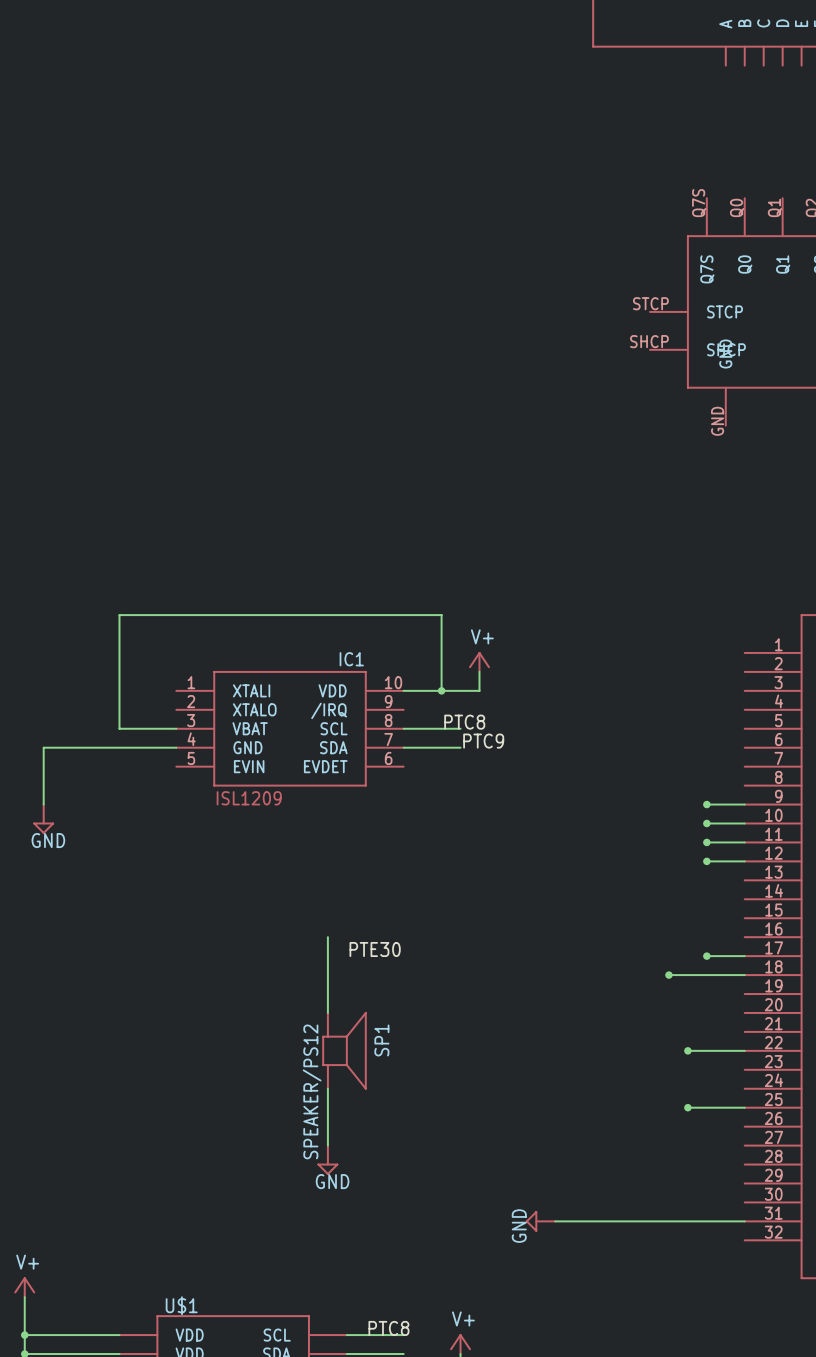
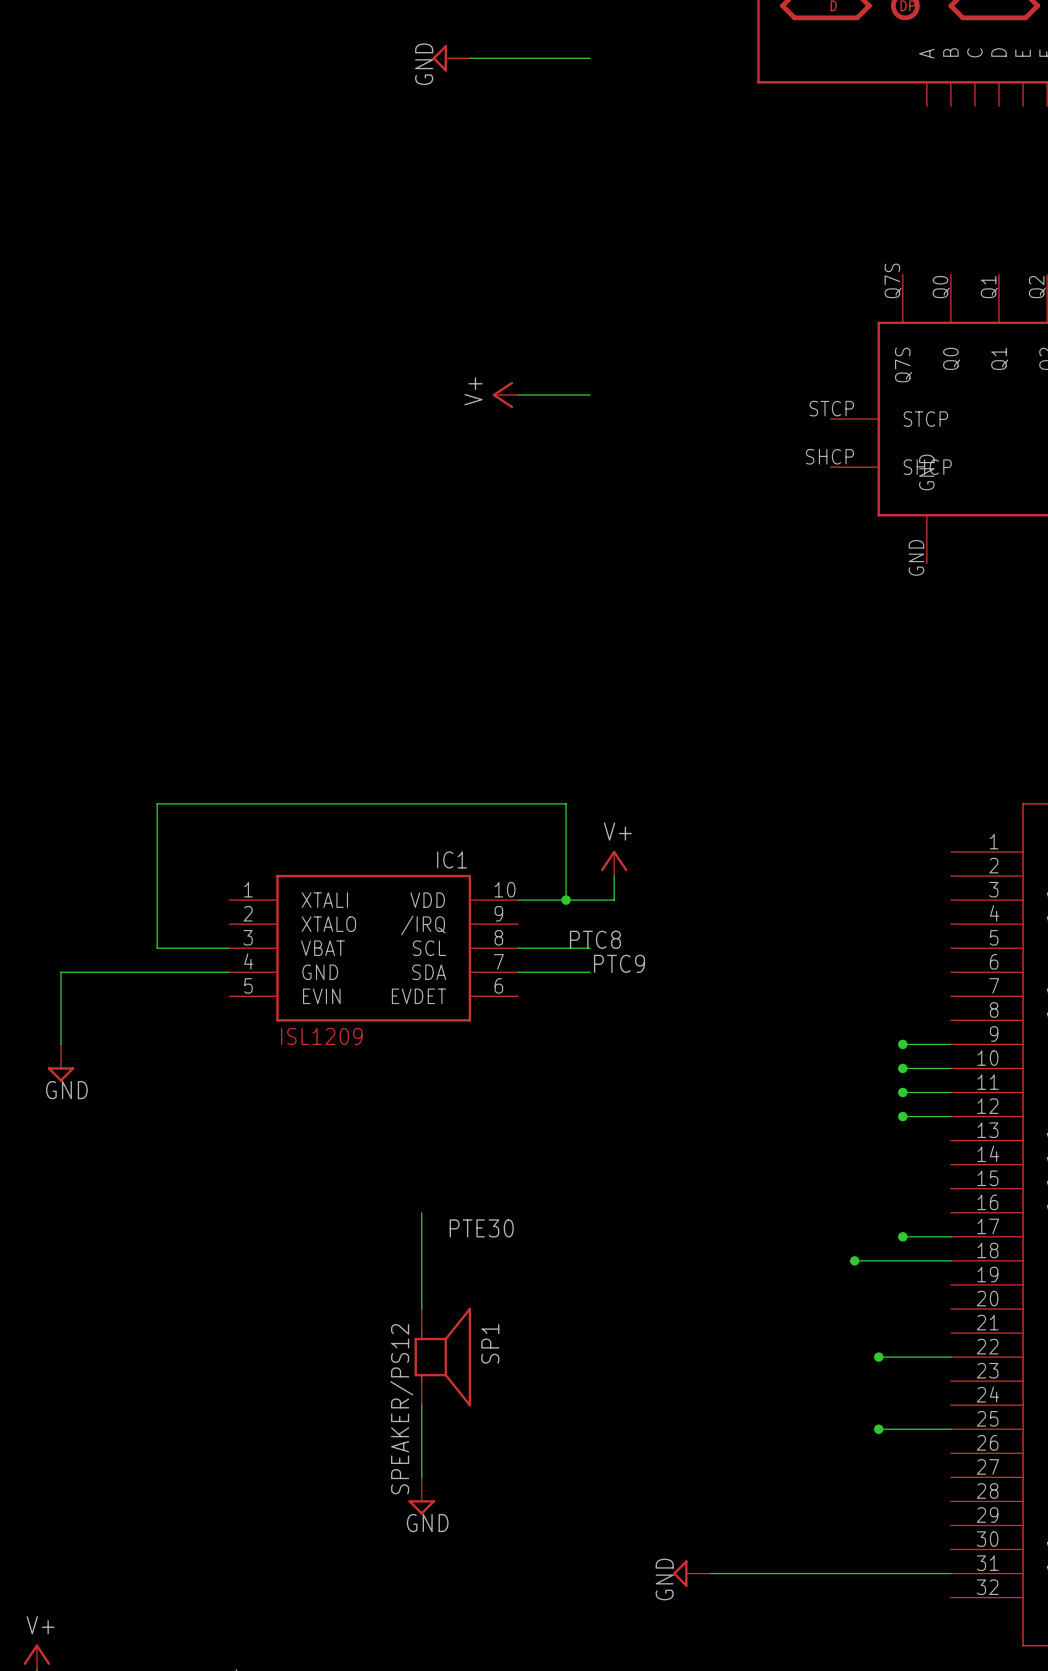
power symbol: none -> GND (451, 58)
wire: none -> (469, 58) (590, 58)
power symbol: none -> V+ (505, 395)
wire: none -> (517, 395) (590, 395)

